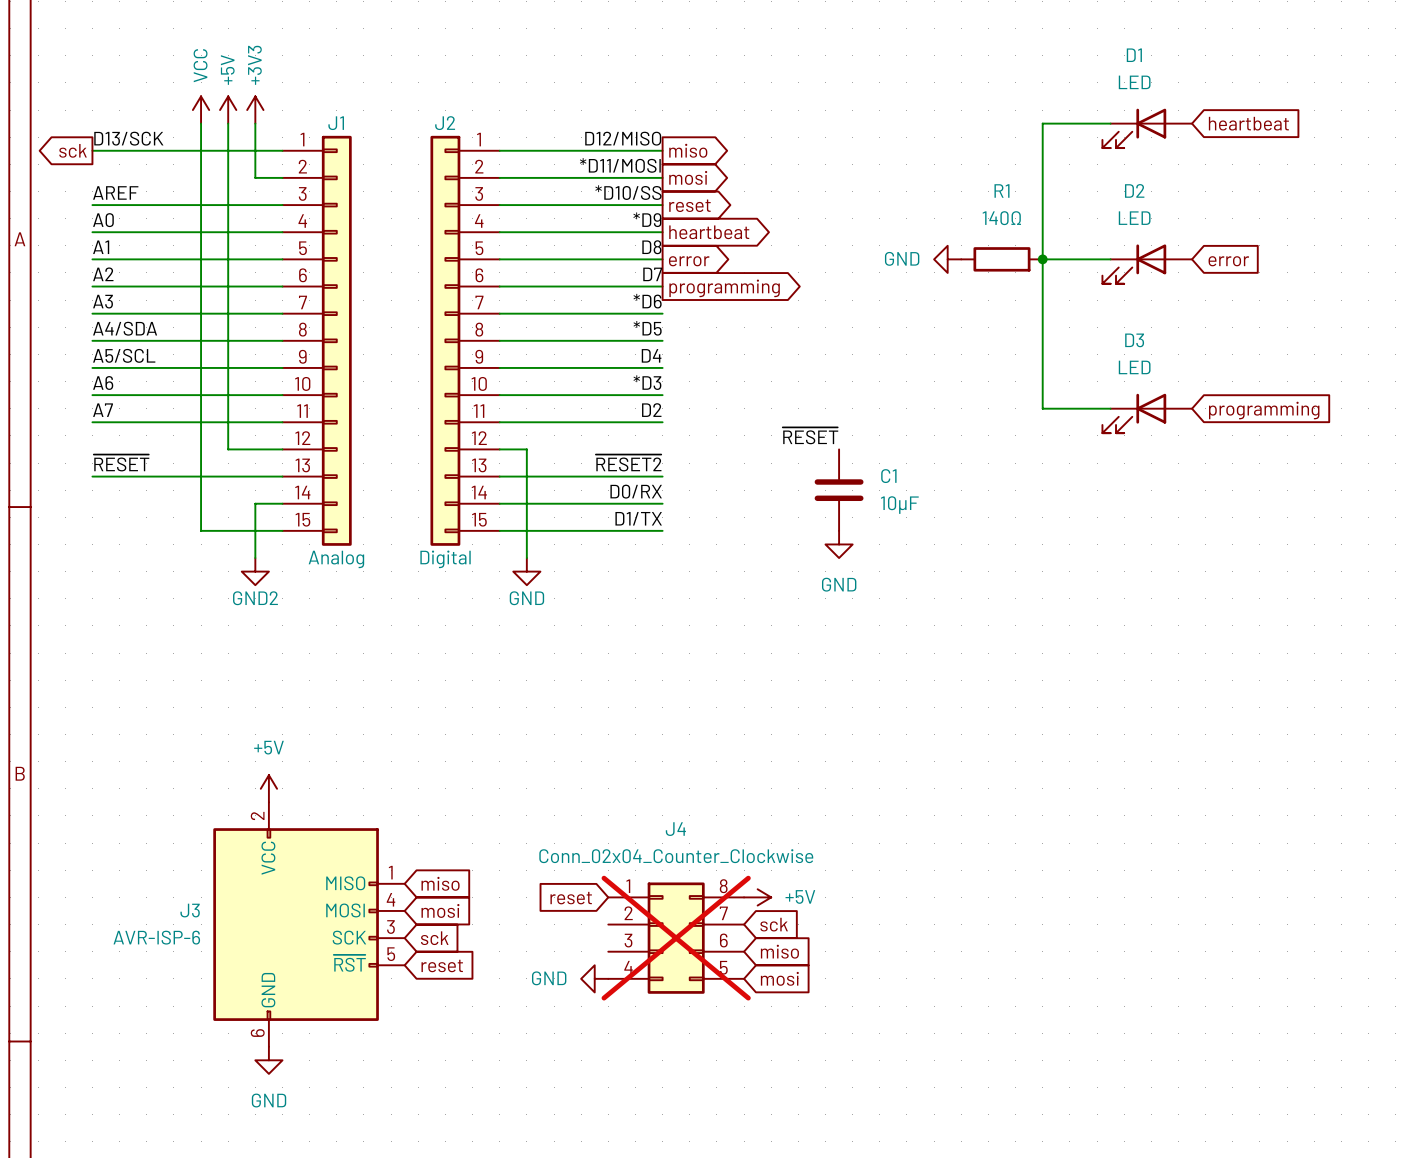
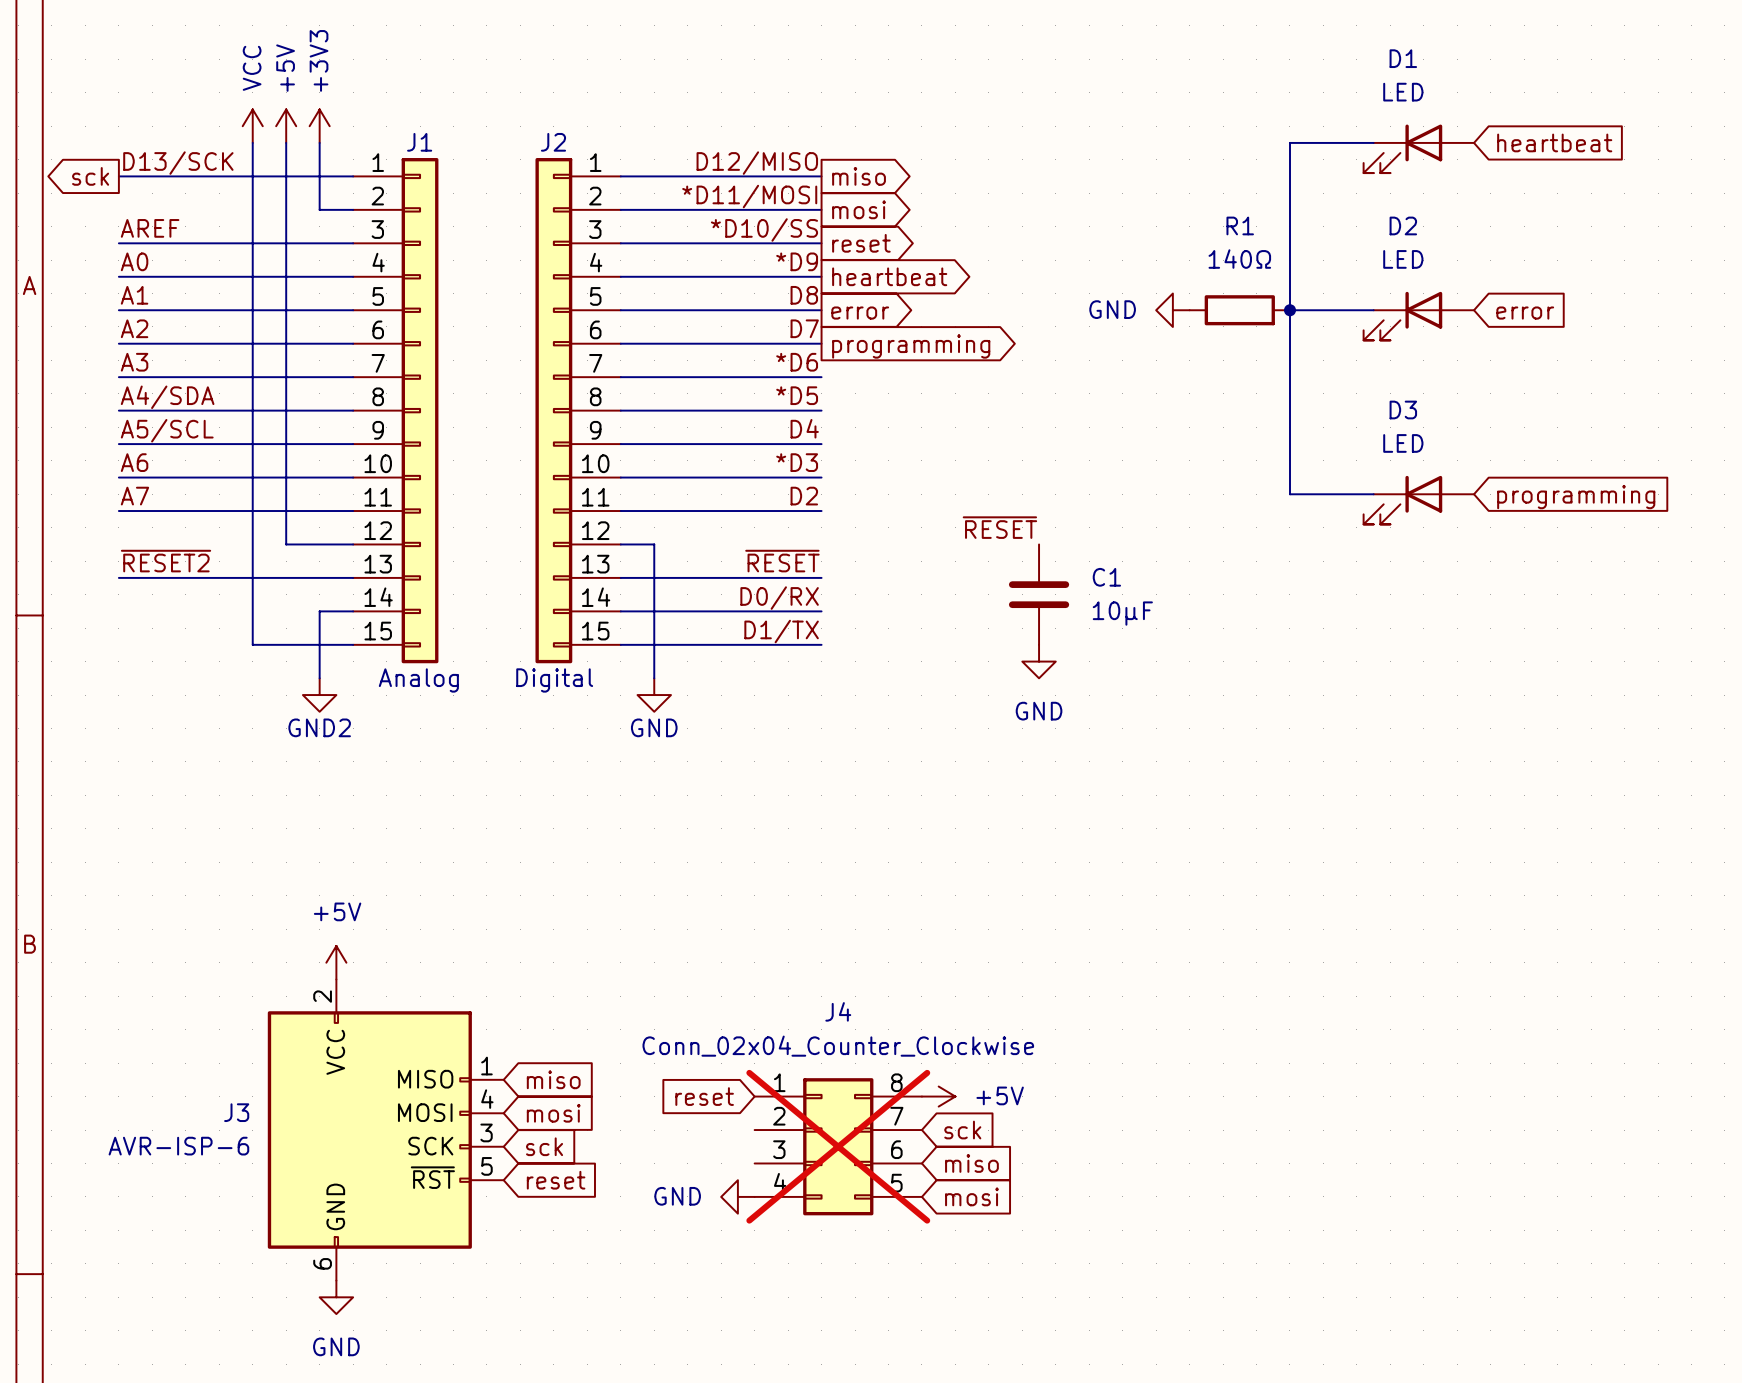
label: ~{RESET} (121, 462) -> ~{RESET2} (166, 561)
label: ~{RESET2} (628, 462) -> ~{RESET} (782, 561)

